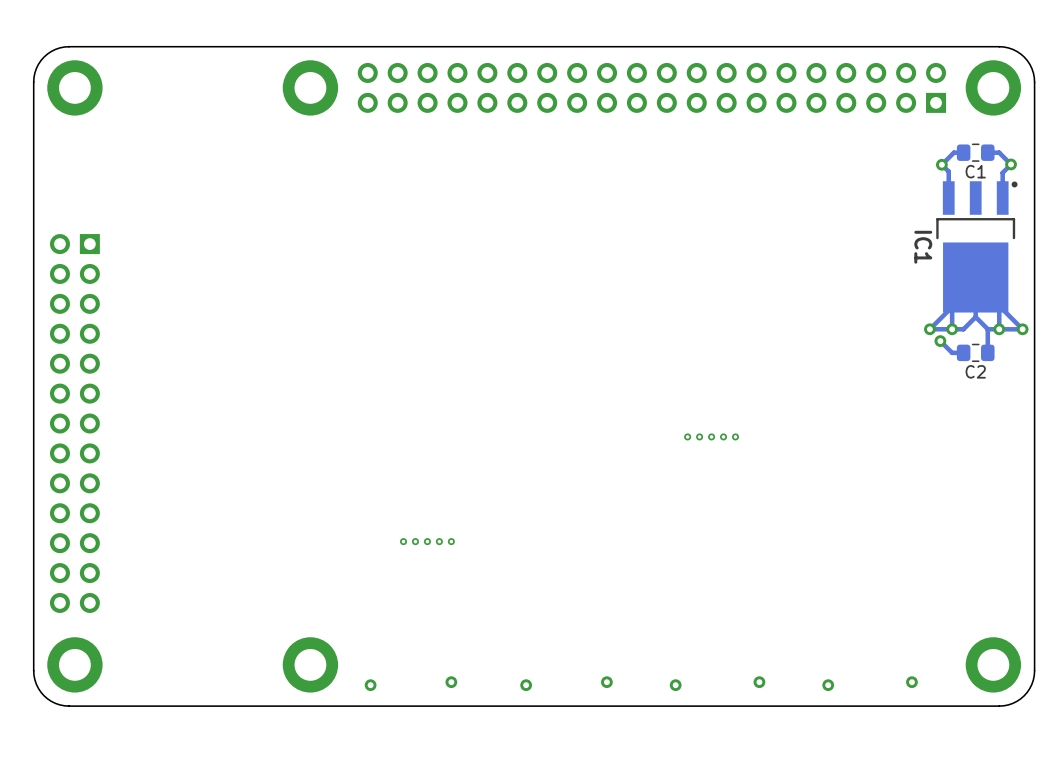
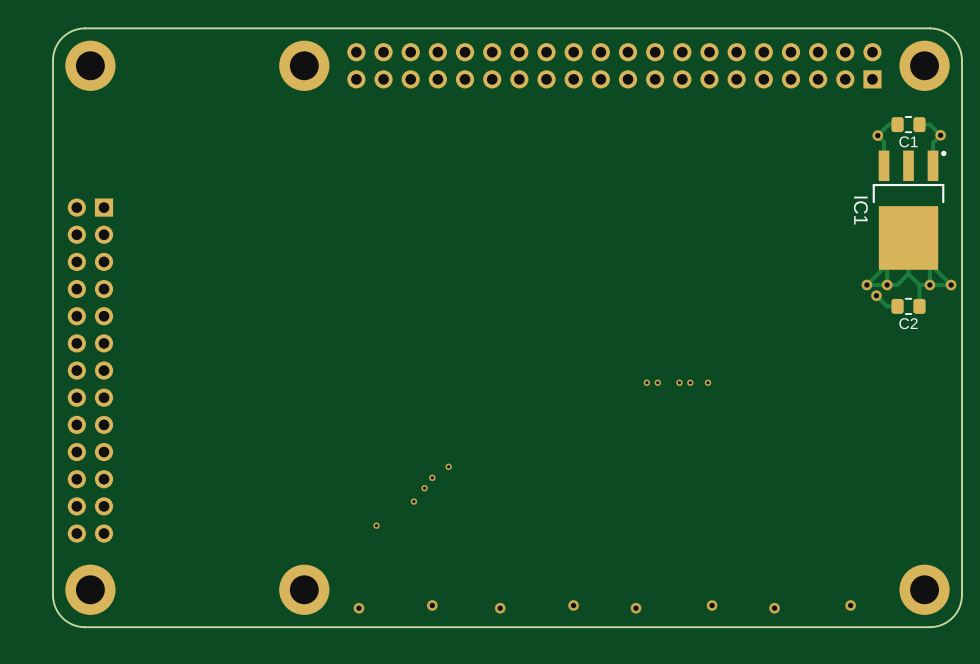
via position: (711, 436) -> (708, 382)
via: none -> (448, 466)
via: (403, 541) -> none
via: (415, 541) -> none
via: (427, 541) -> none
via: (439, 541) -> none
via: none -> (424, 488)
via: none -> (413, 501)
via: none -> (376, 525)

